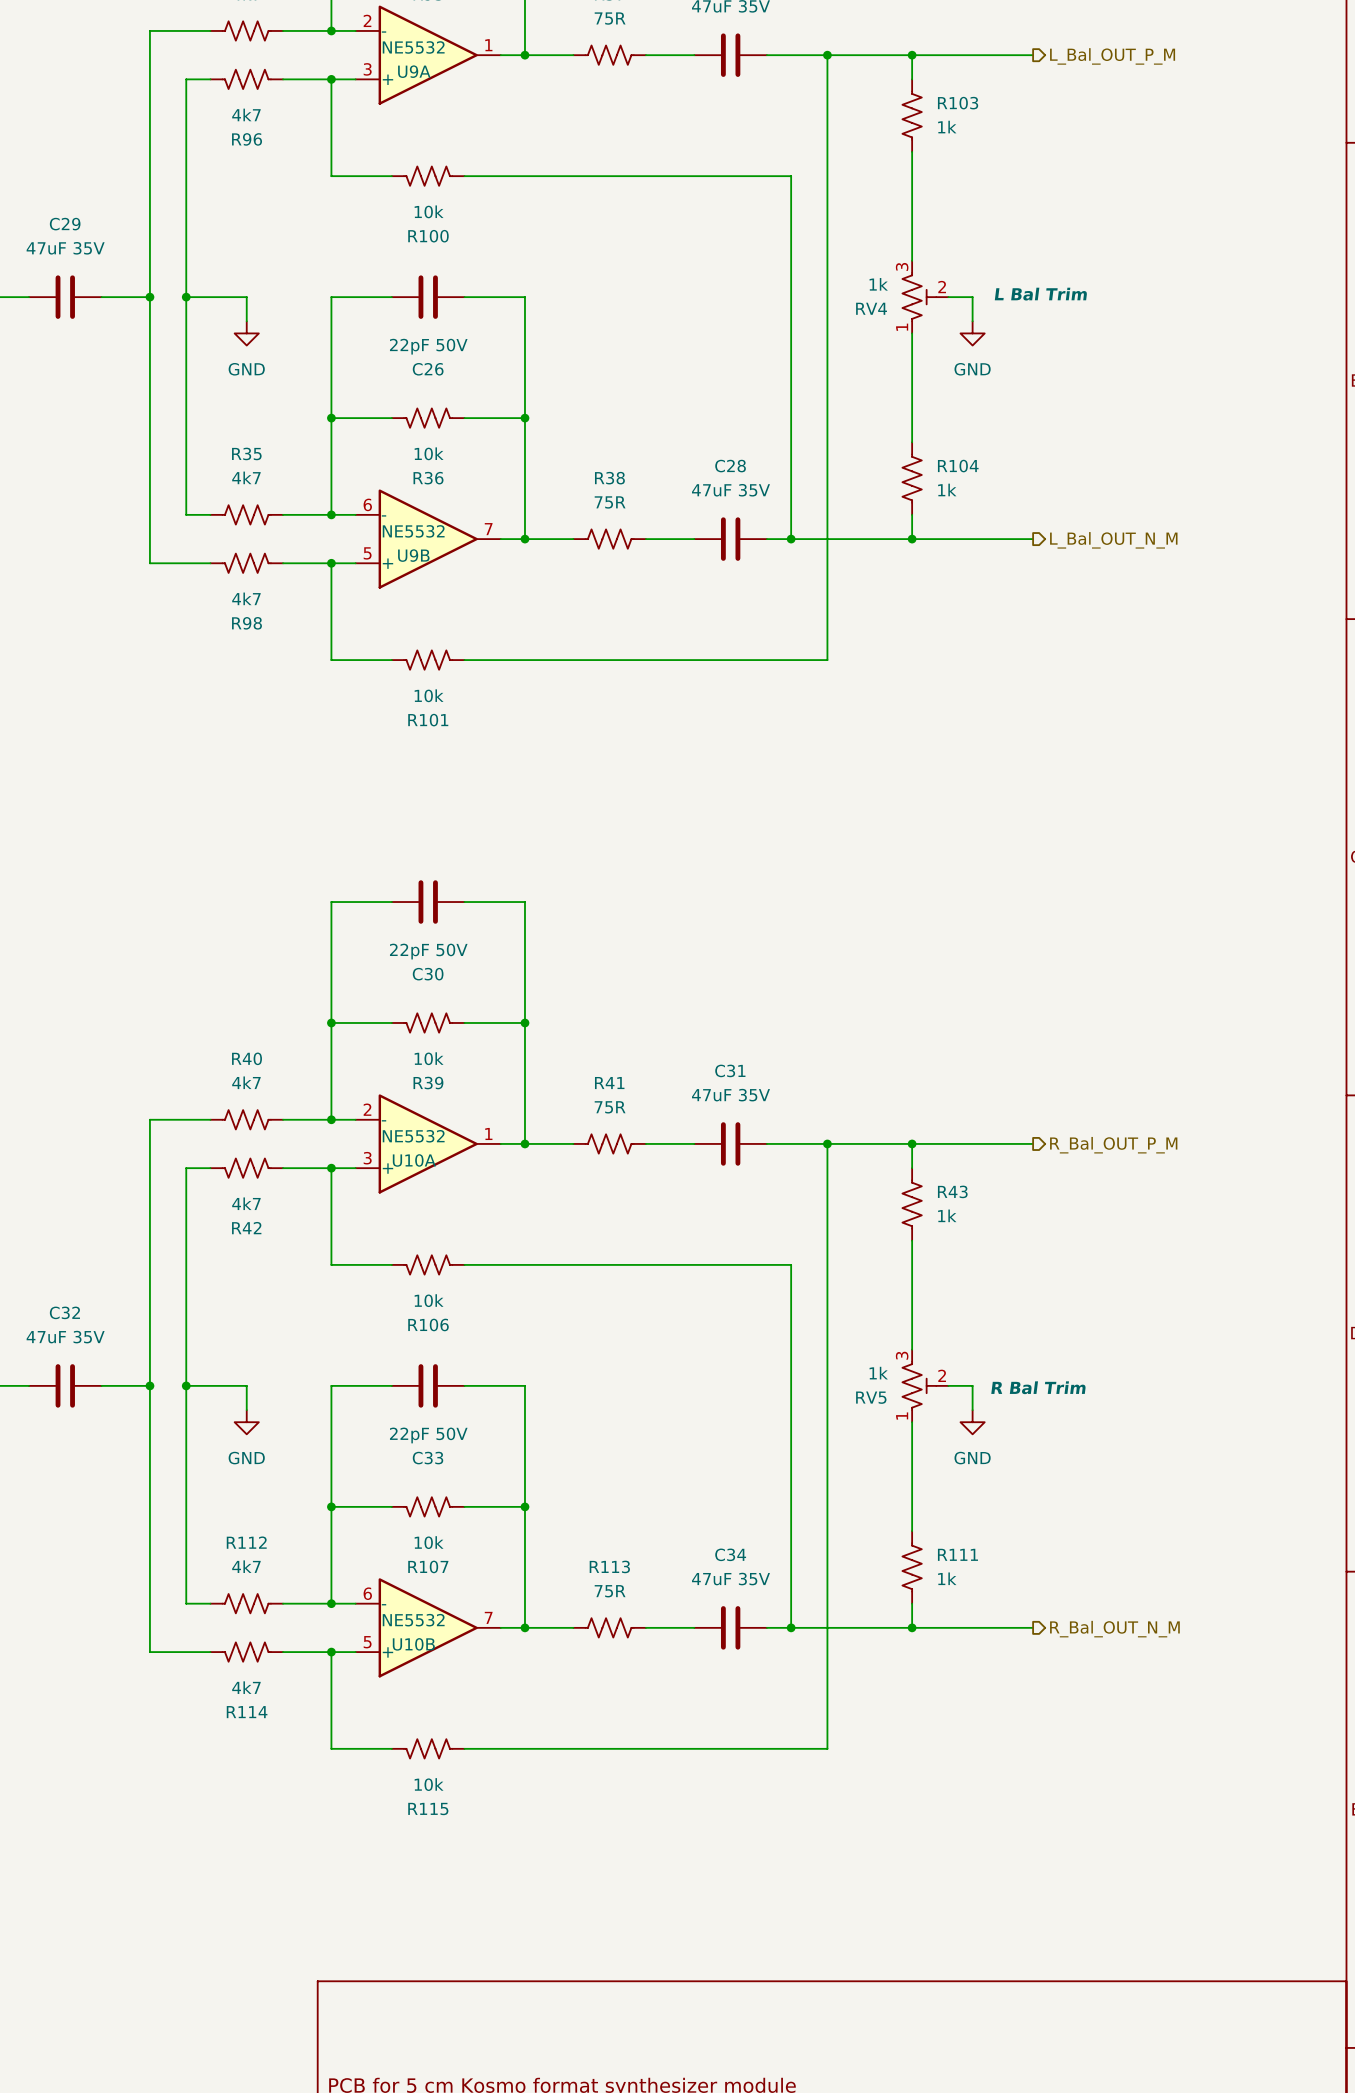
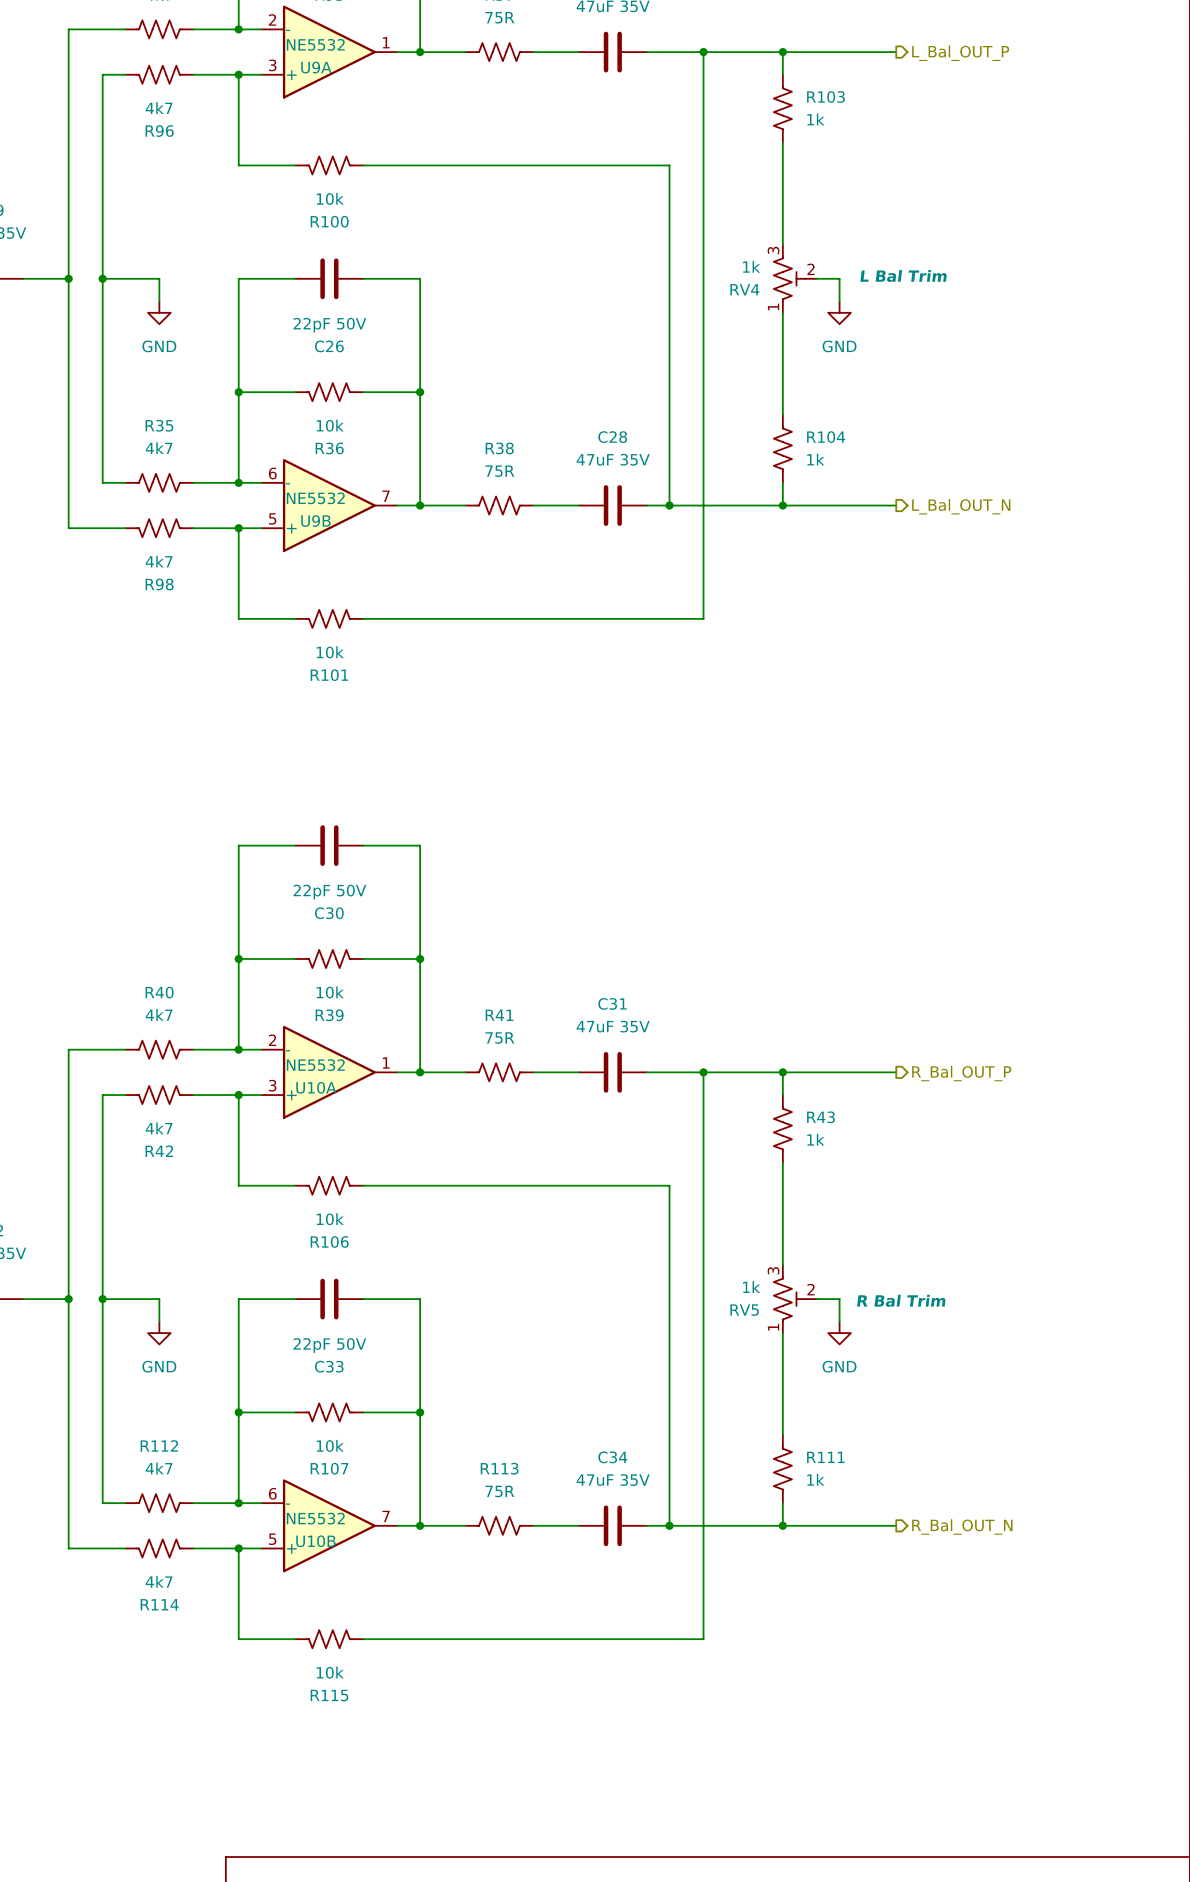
hierarchical label: L_Bal_OUT_P_M (1112, 56) -> L_Bal_OUT_P (960, 53)
hierarchical label: L_Bal_OUT_N_M (1113, 540) -> L_Bal_OUT_N (961, 506)
hierarchical label: R_Bal_OUT_P_M (1113, 1145) -> R_Bal_OUT_P (961, 1073)
hierarchical label: R_Bal_OUT_N_M (1114, 1629) -> R_Bal_OUT_N (962, 1526)

